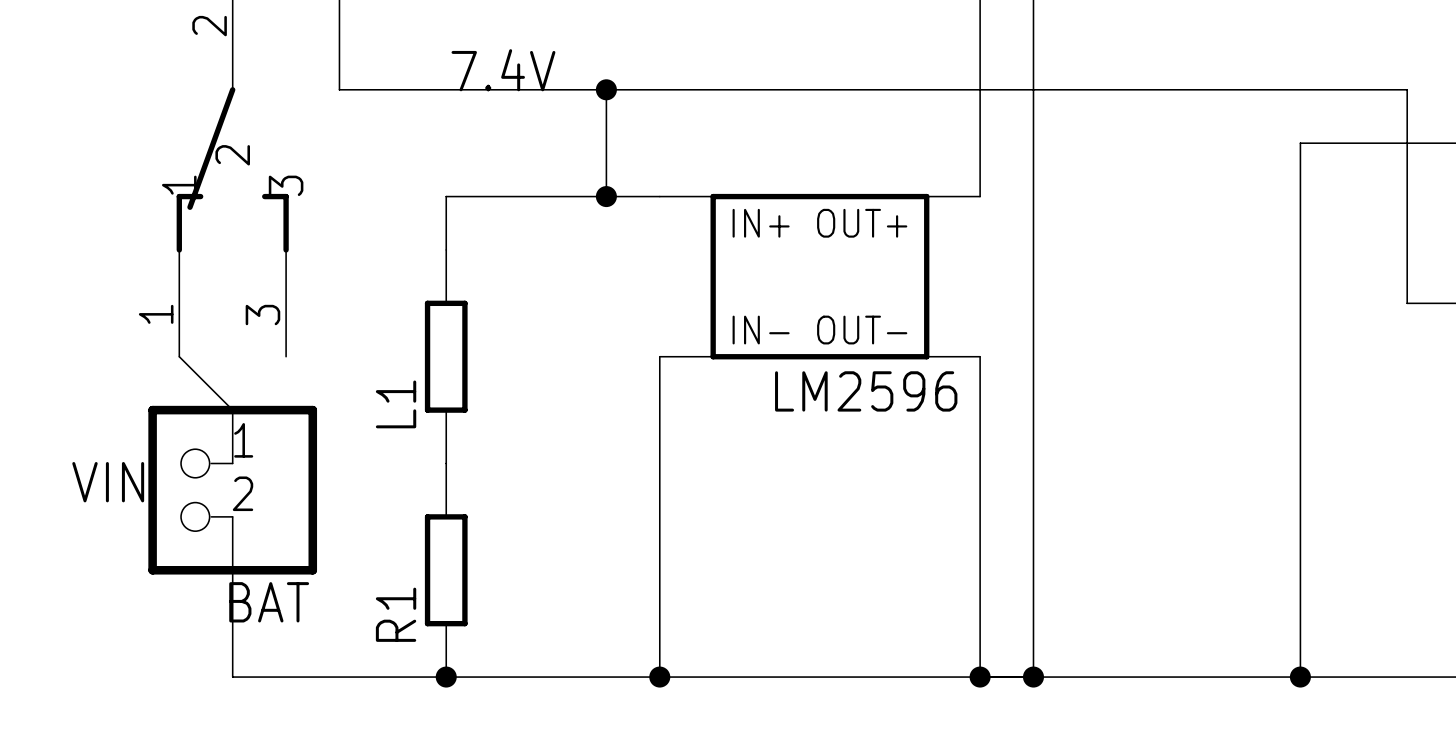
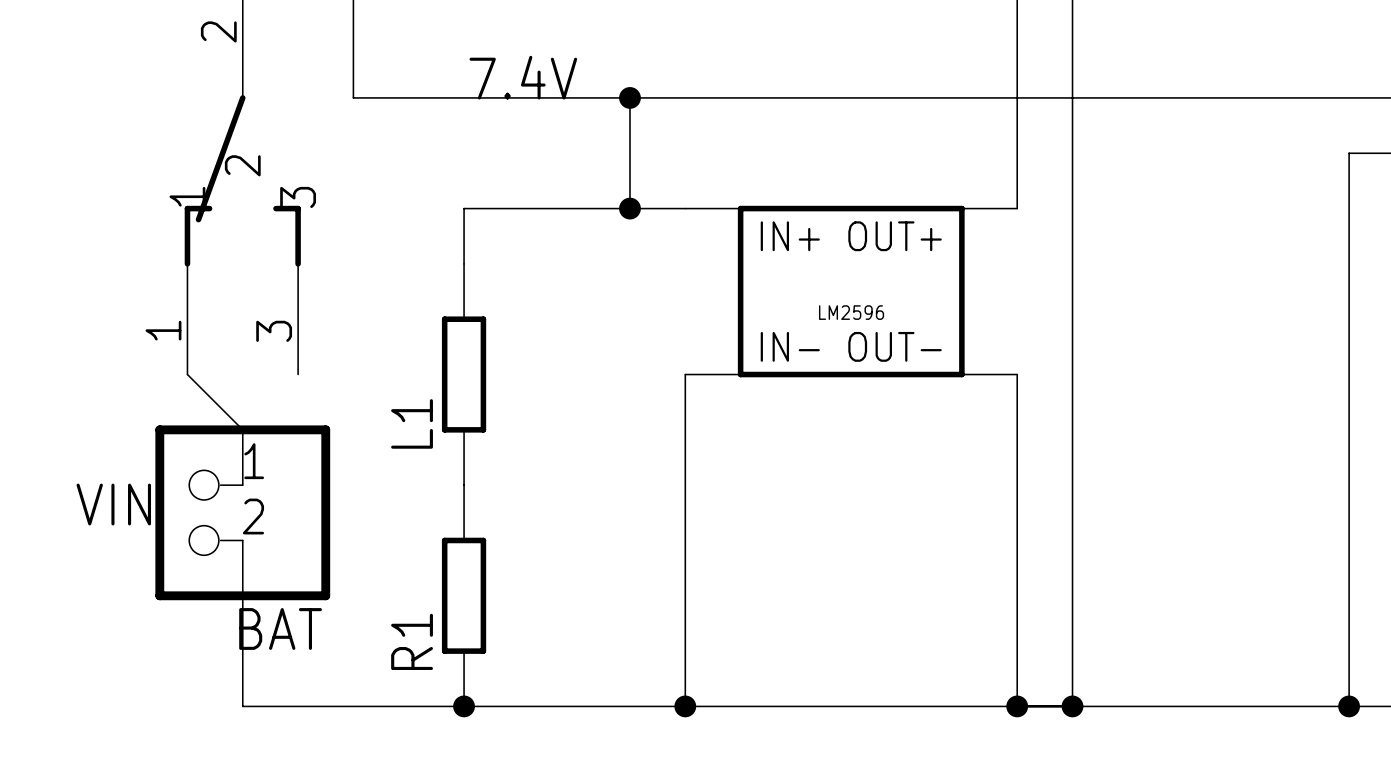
part text: none -> LM2596 (851, 312)
part text: LM2596 (866, 391) -> none

